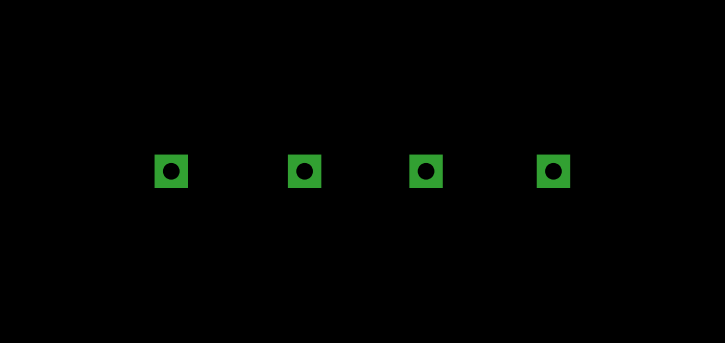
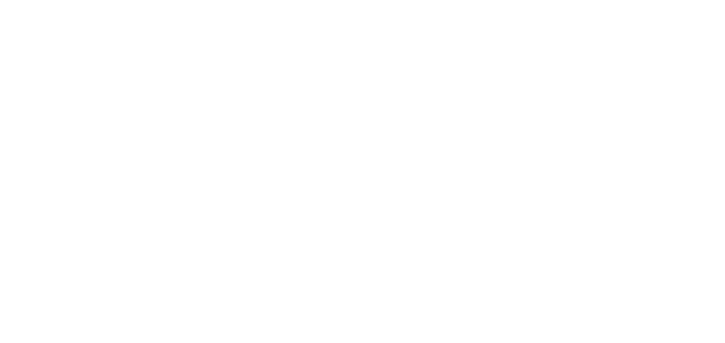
part: (171, 171) -> none
part: (304, 171) -> none
part: (426, 171) -> none
part: (553, 171) -> none

